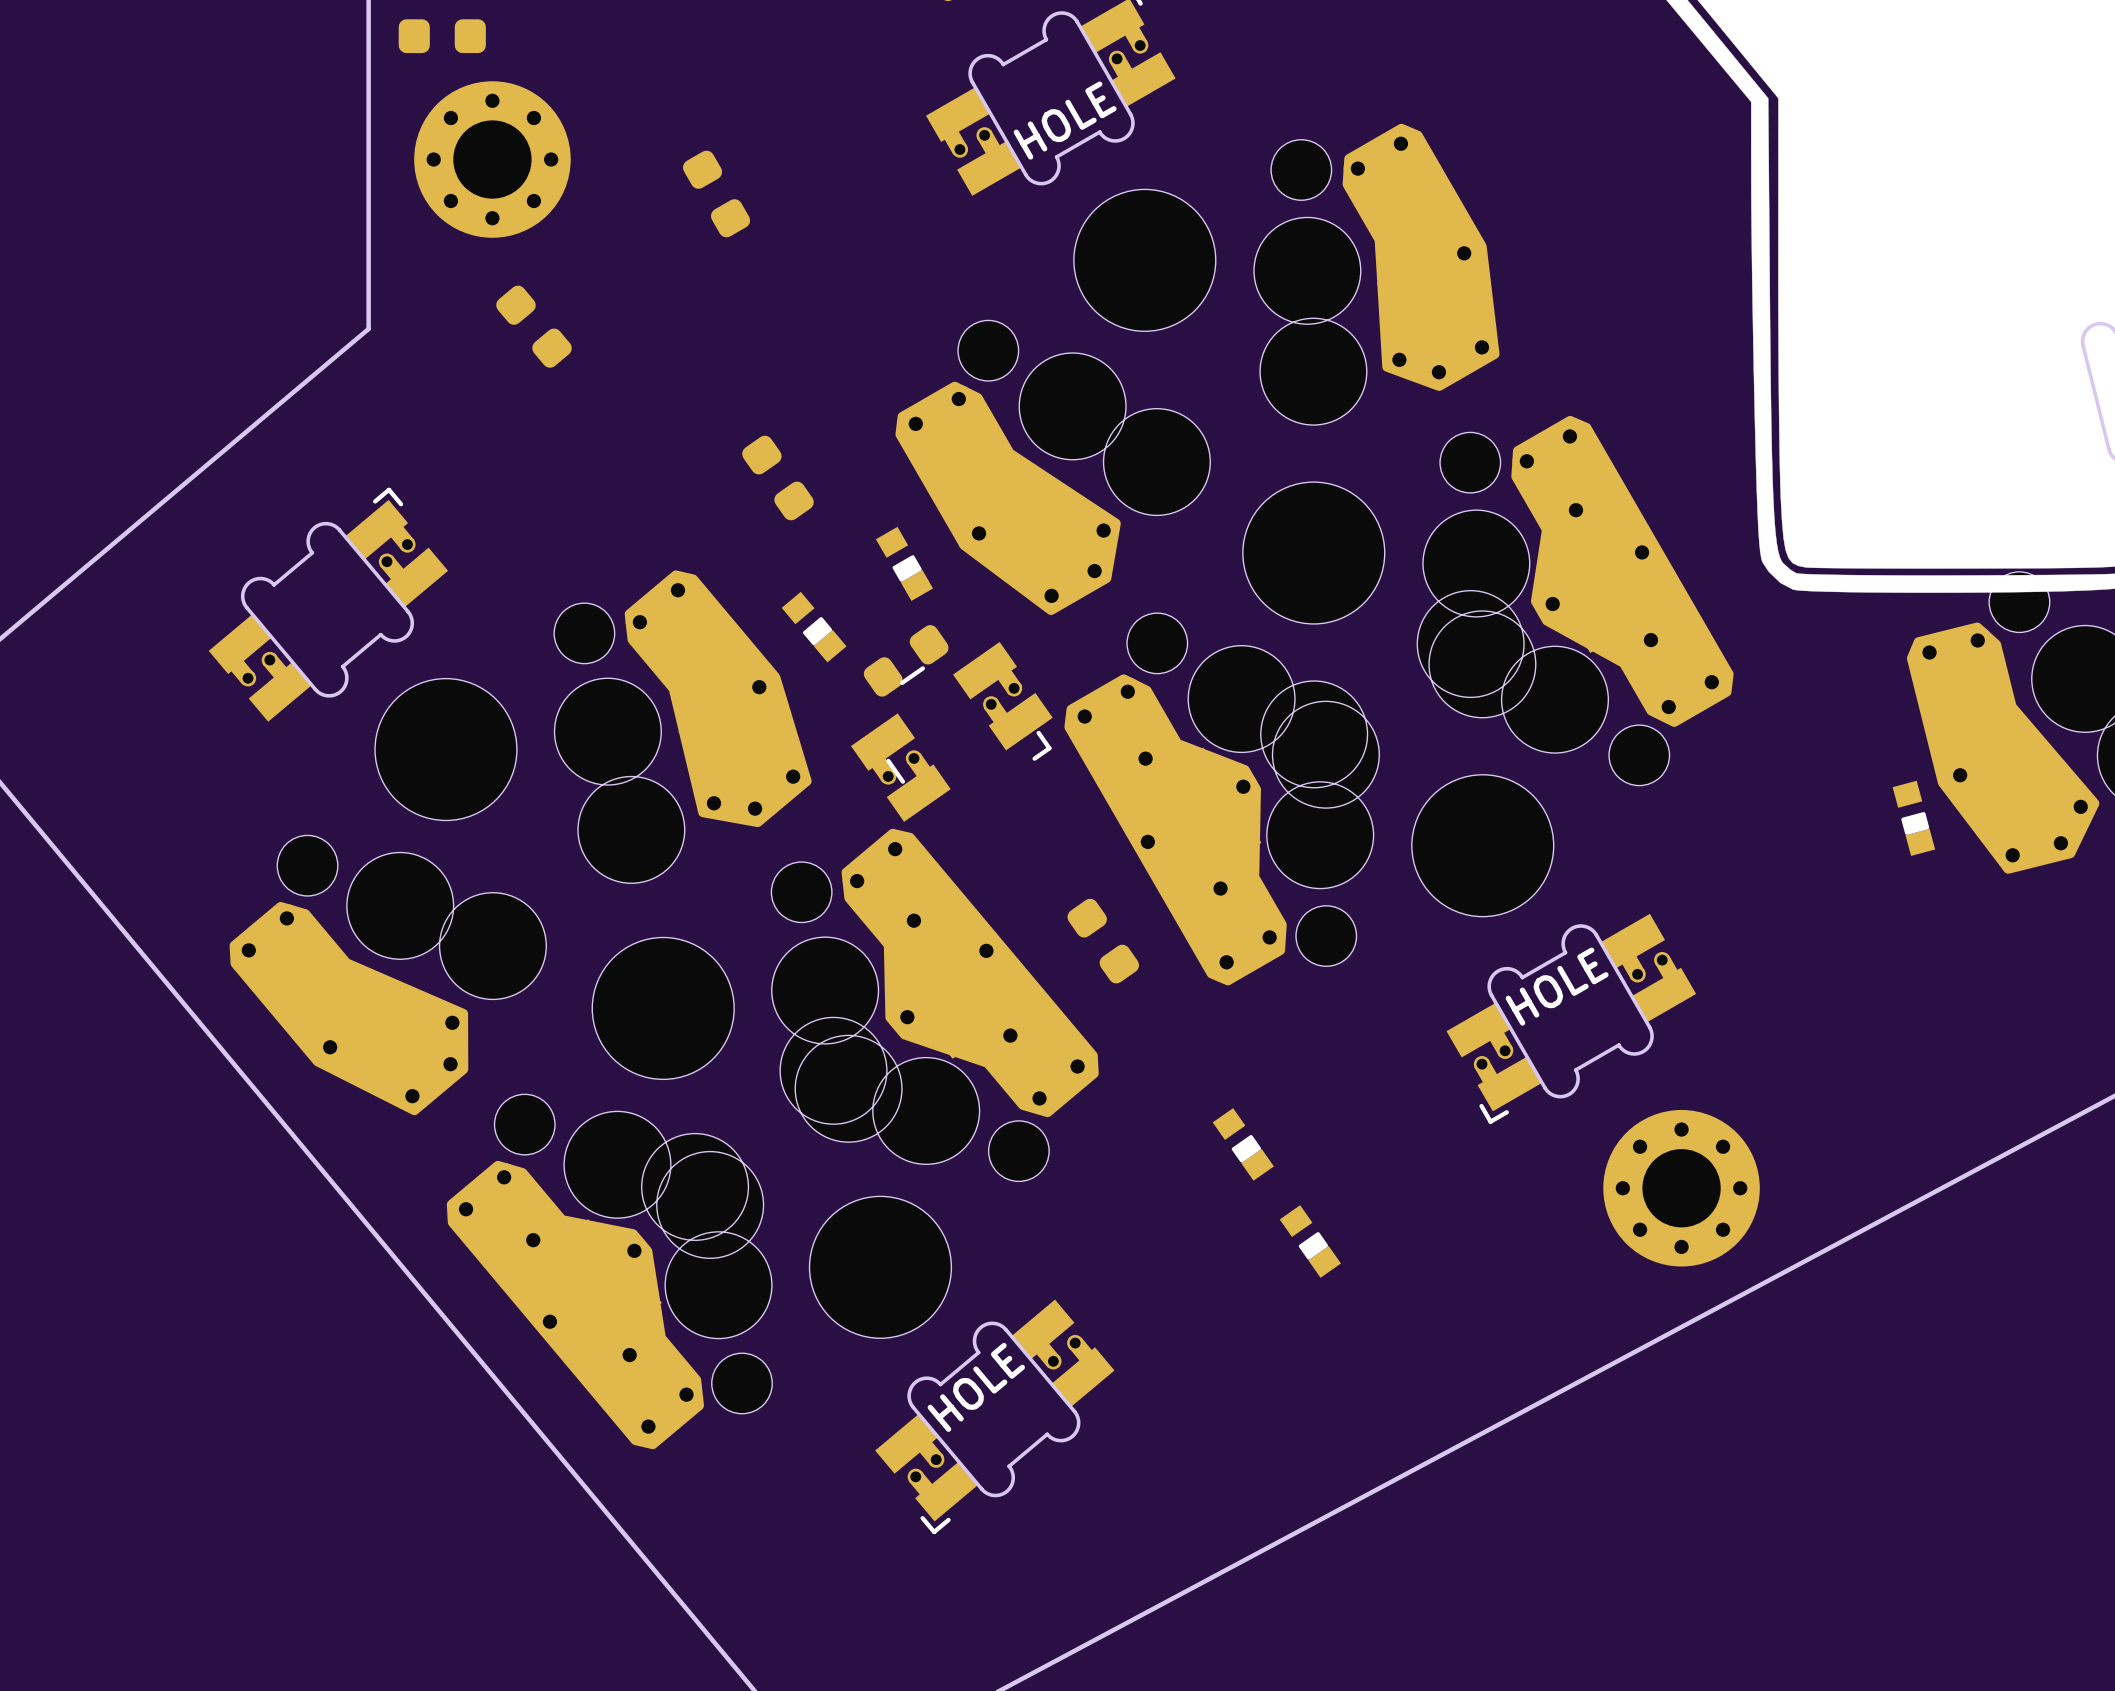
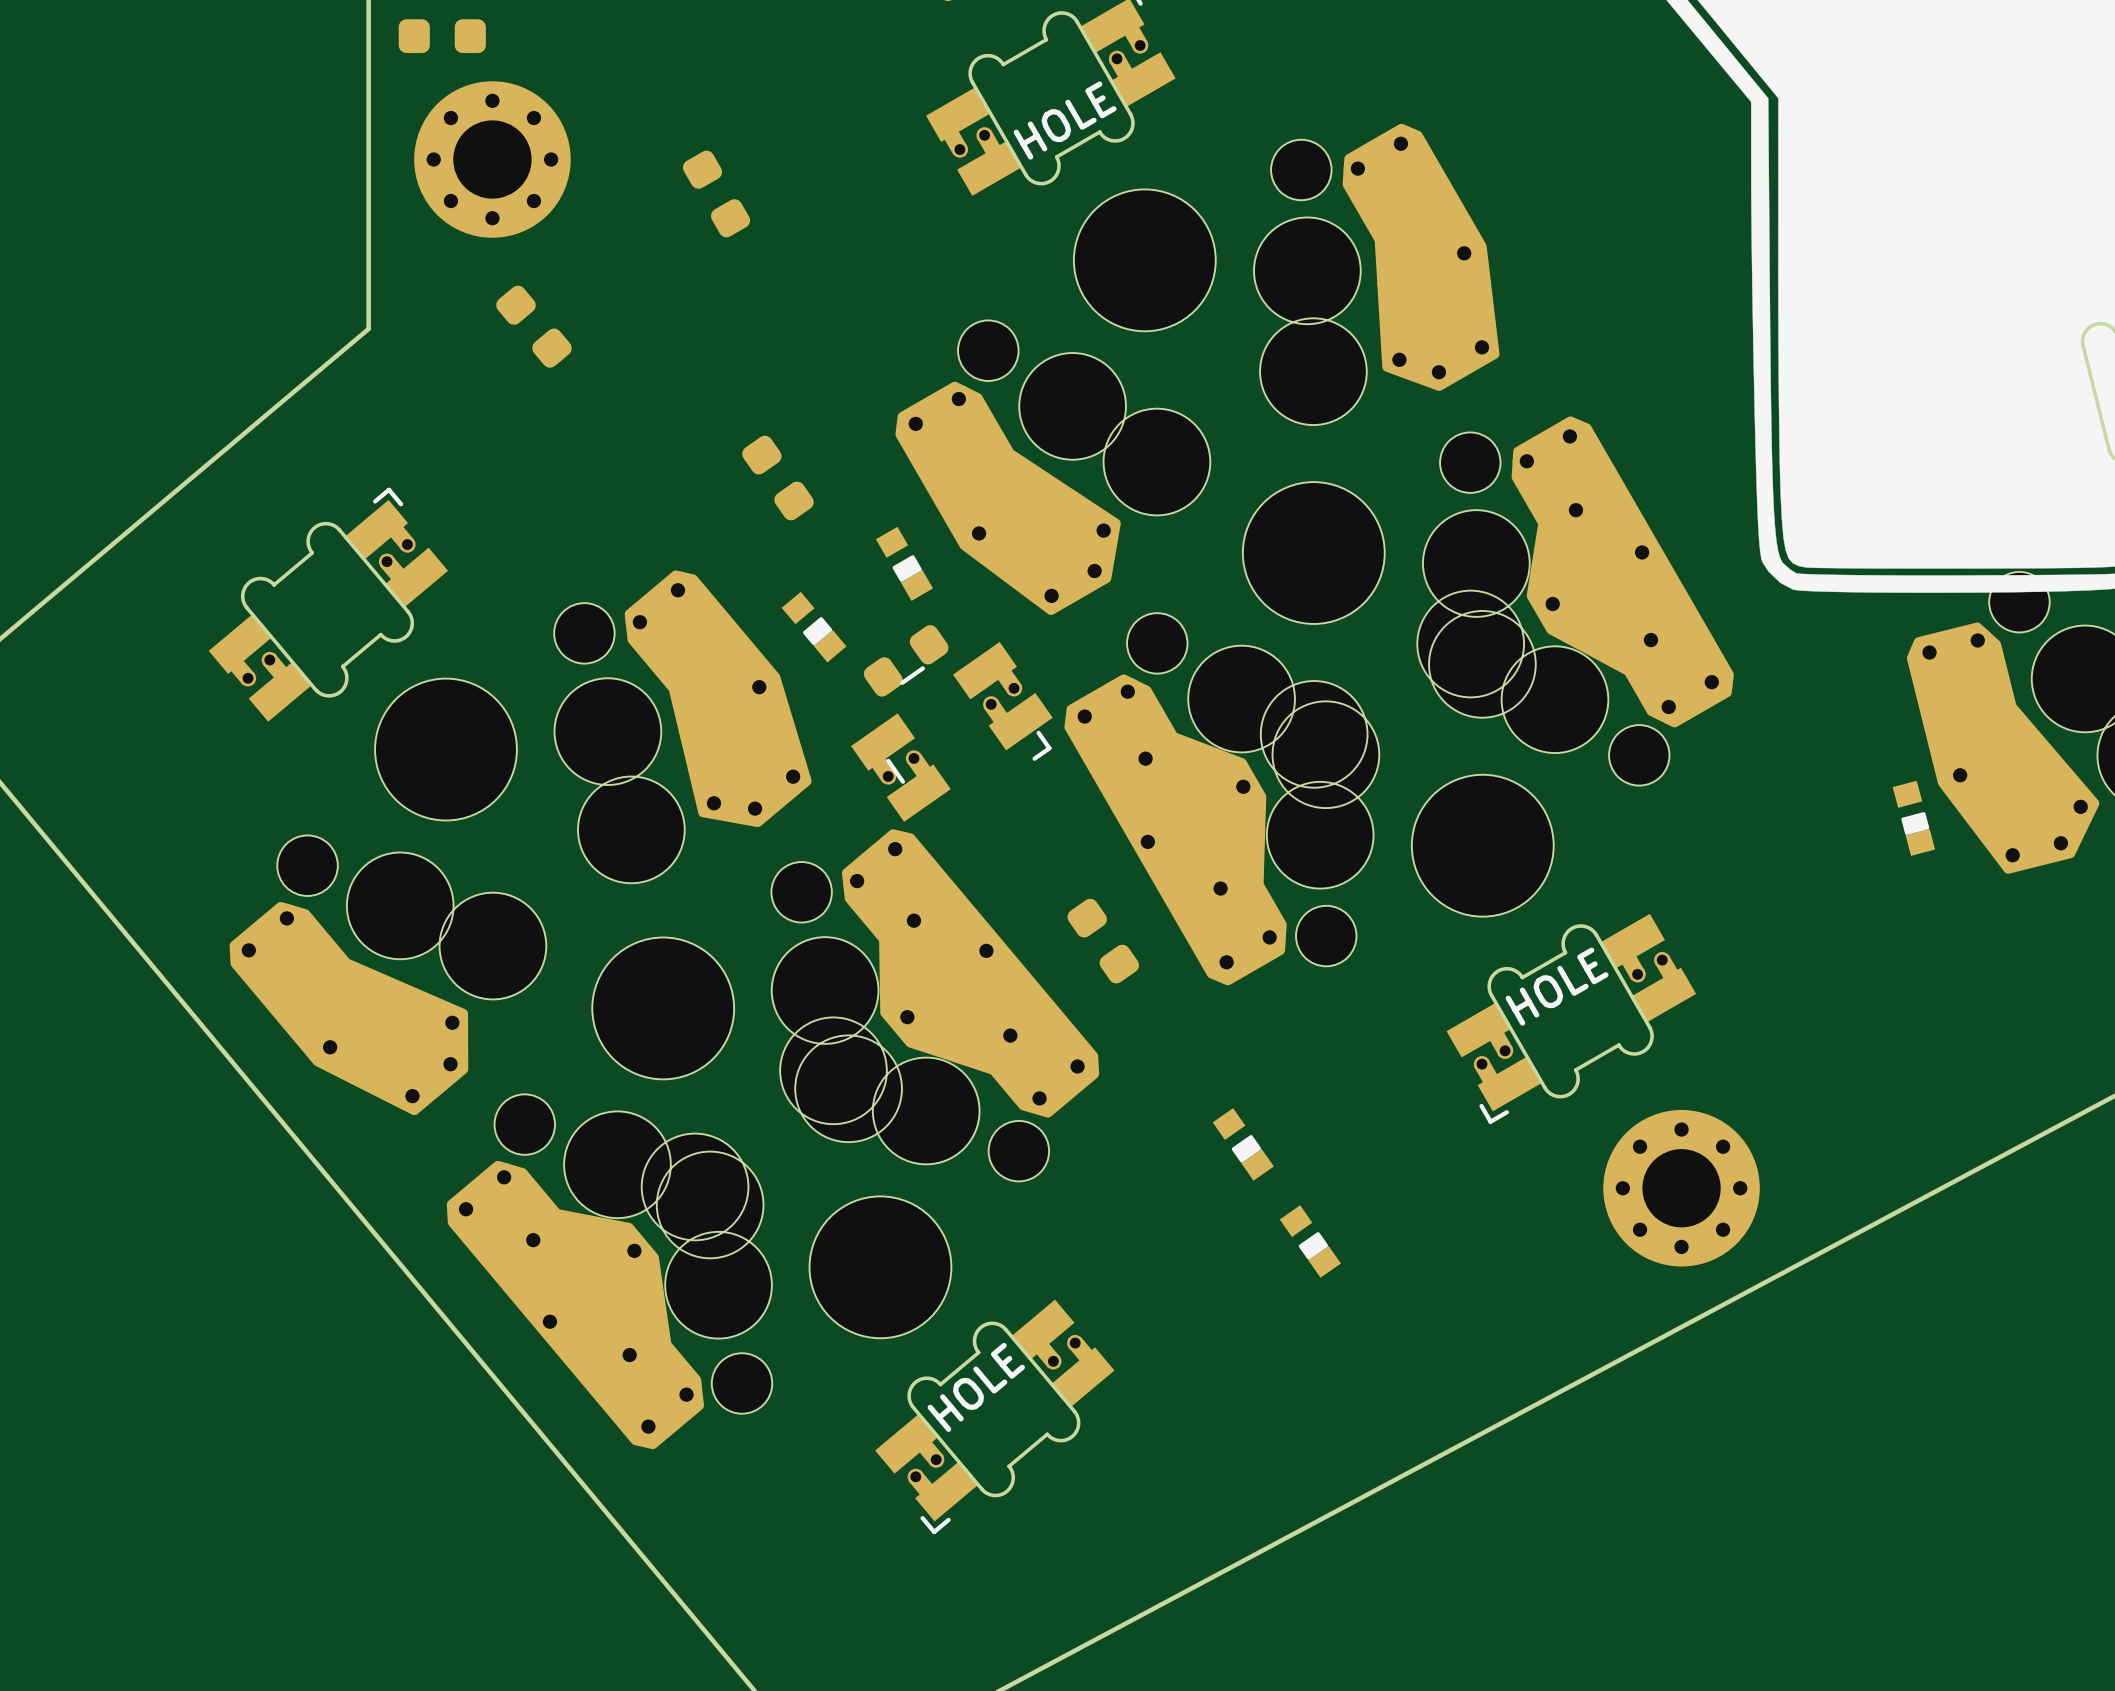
part footprint: [895, 123, 1734, 986] -> [895, 123, 1734, 986]
part footprint: [229, 570, 1099, 1450] -> [229, 570, 1100, 1450]

